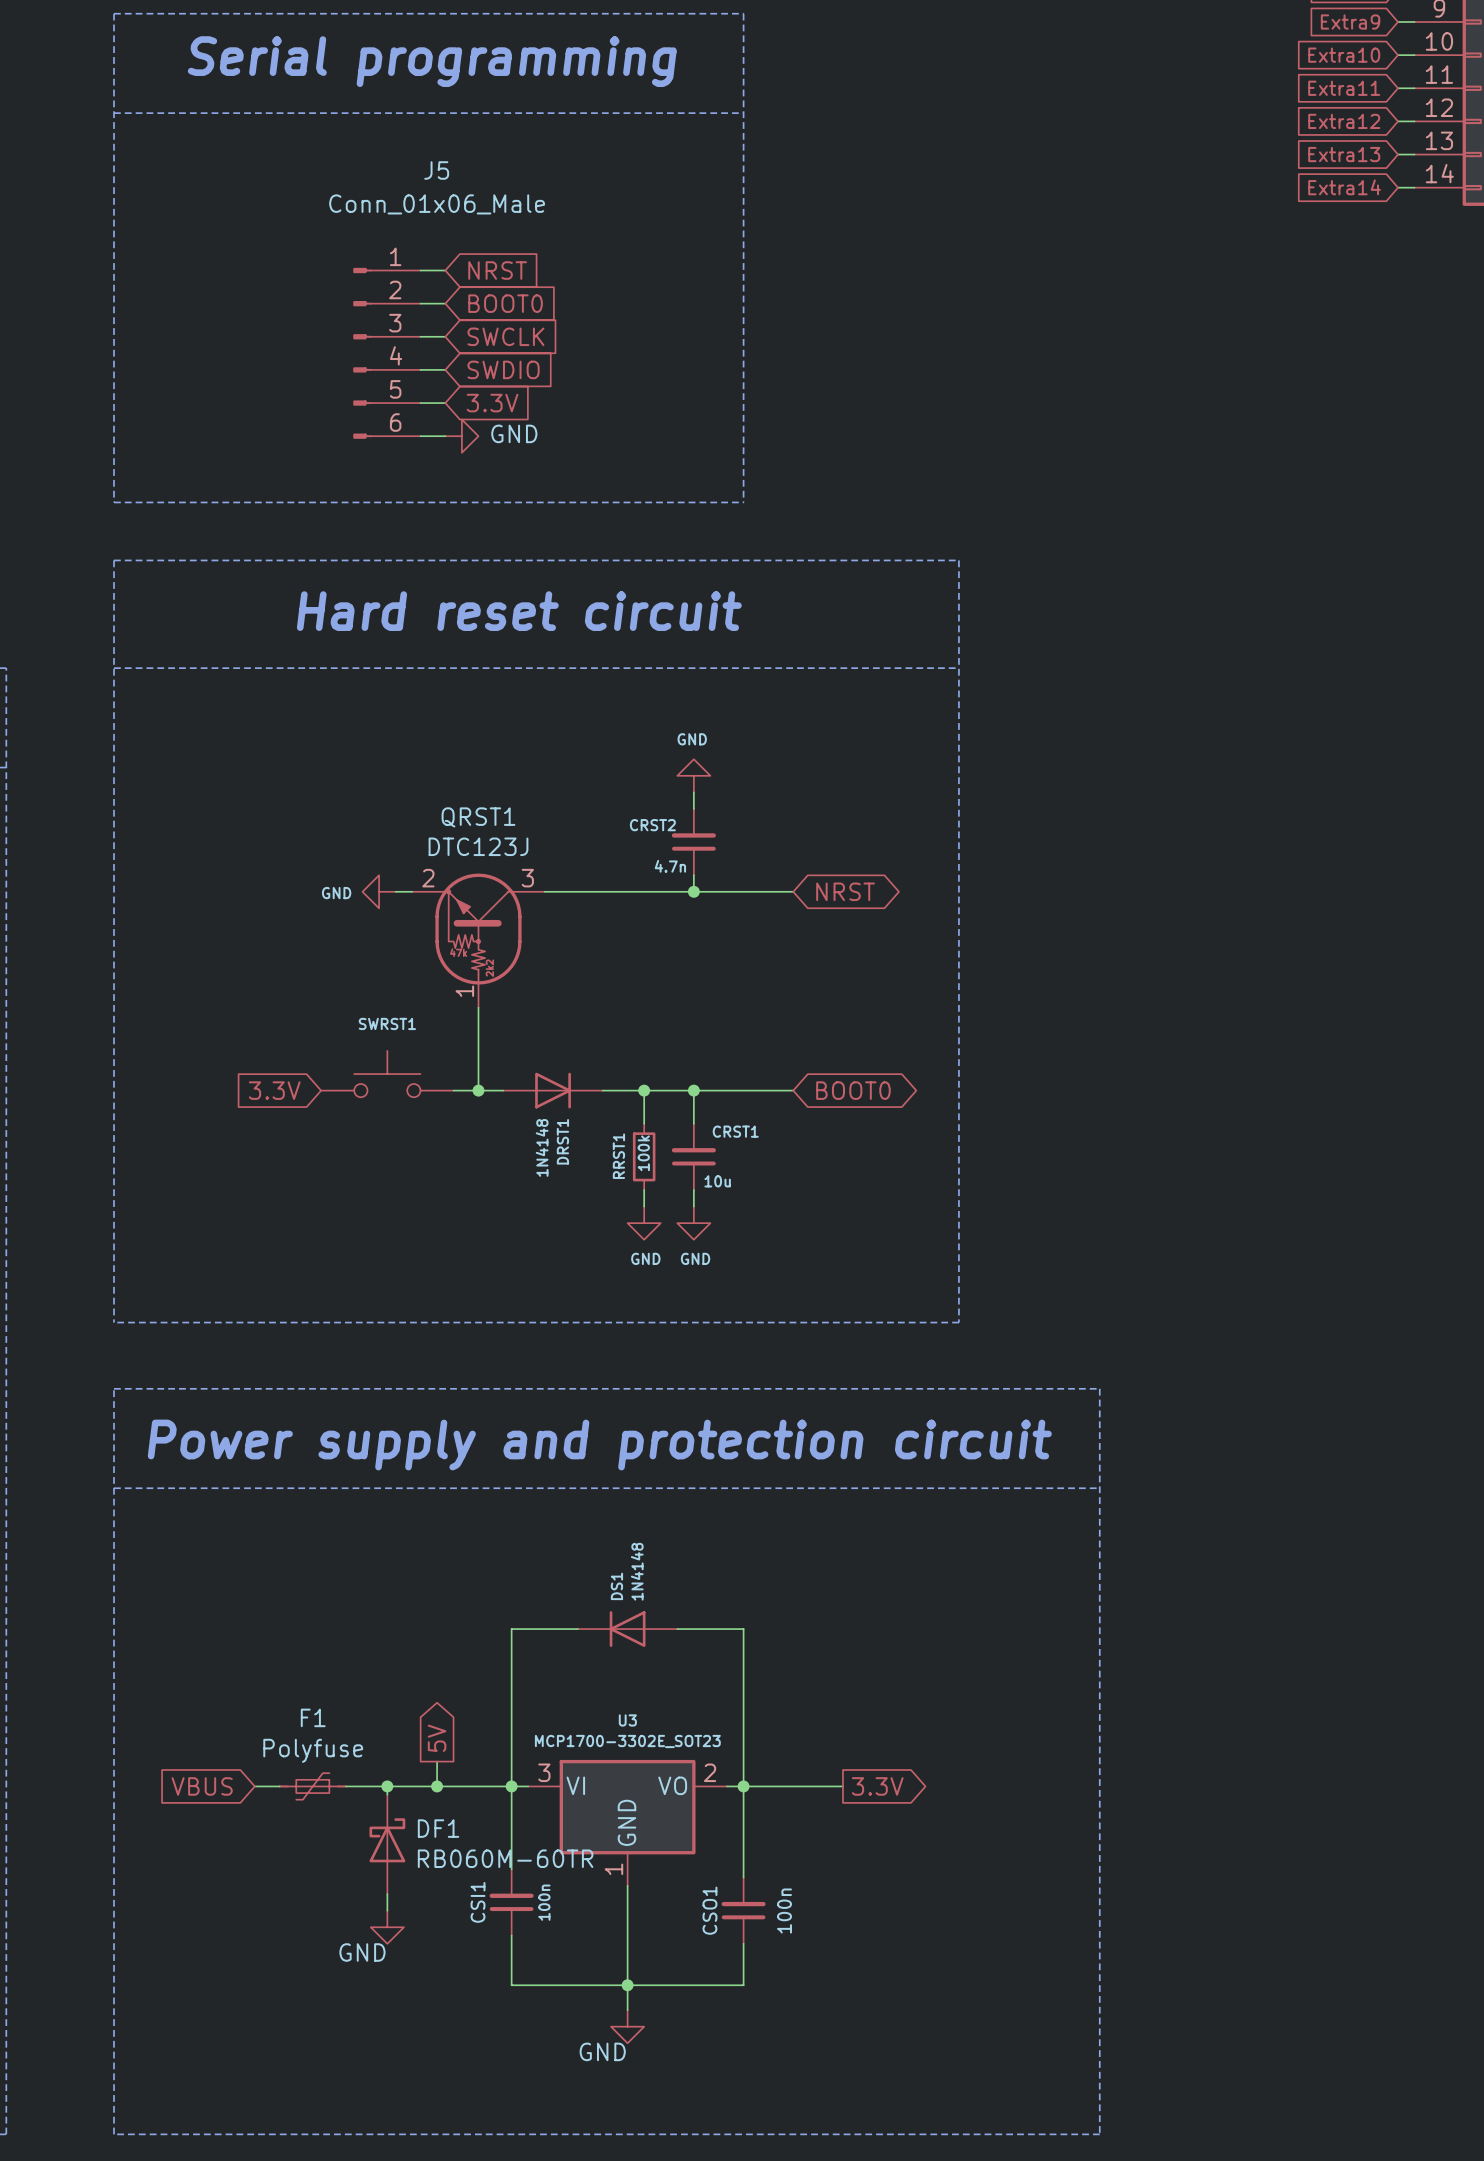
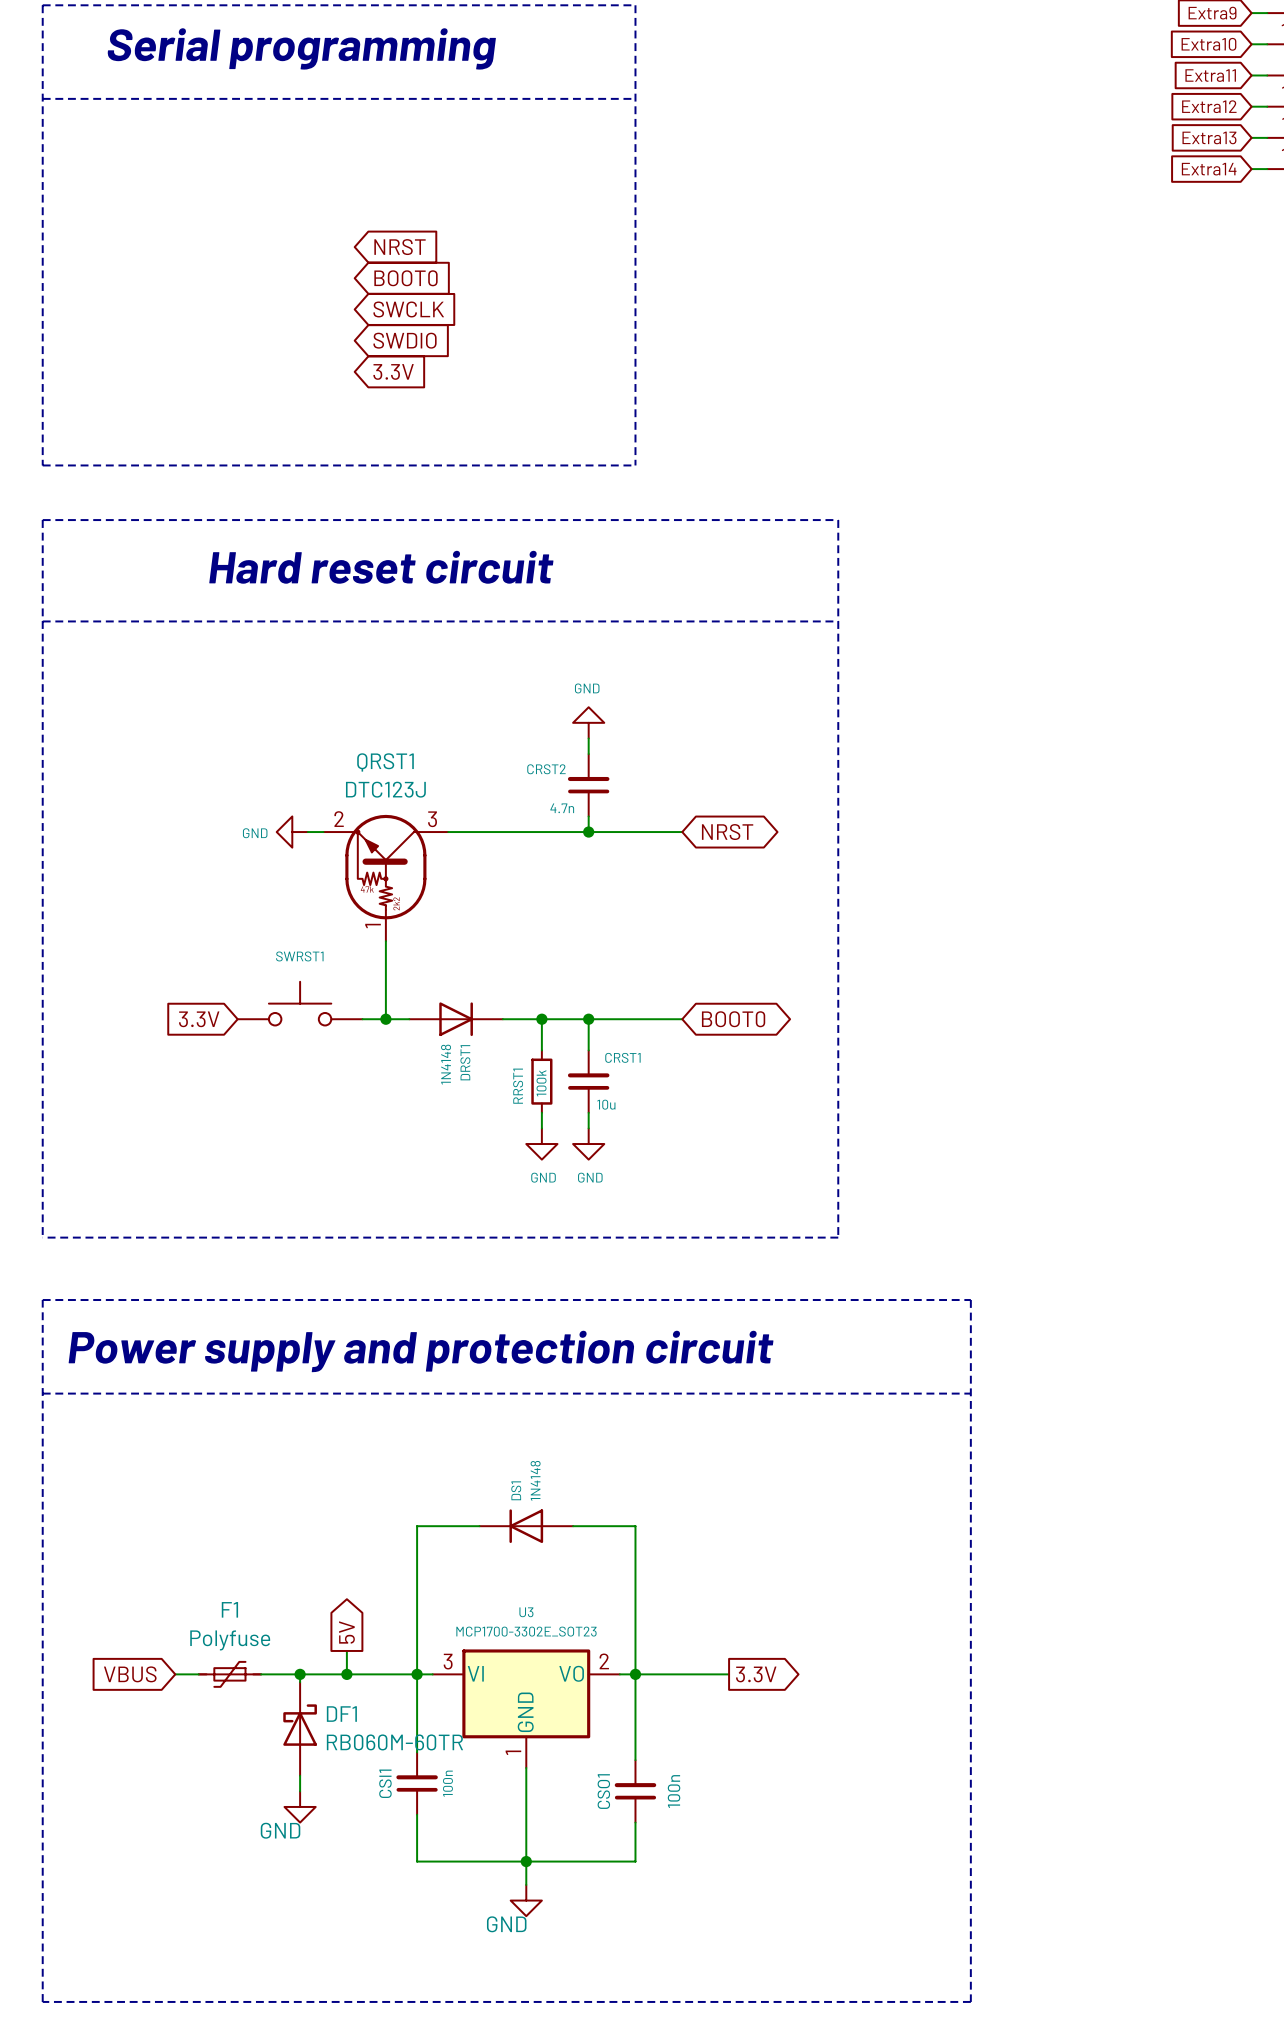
wire: (420, 270) (445, 270) -> none
wire: (420, 303) (445, 303) -> none
wire: (420, 336) (445, 336) -> none
J5: Conn_01x06_Male (386, 353) -> none
wire: (420, 369) (445, 369) -> none
wire: (420, 403) (445, 403) -> none
wire: (420, 436) (445, 436) -> none
power symbol: GND (461, 436) -> none

